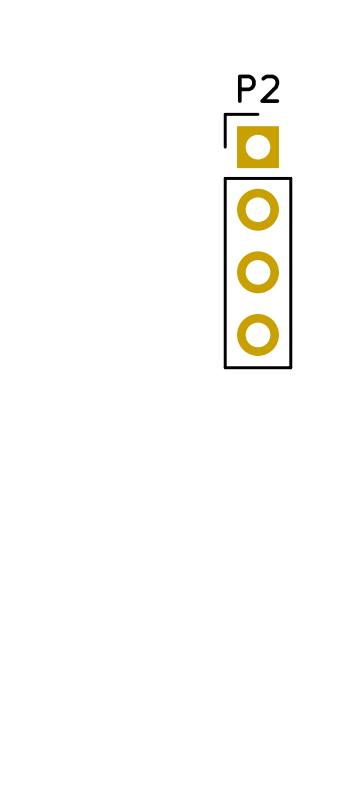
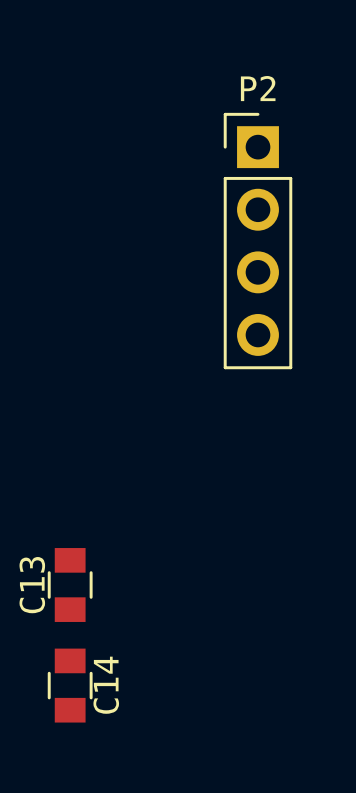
C13: none -> (70, 585)
C14: none -> (70, 685)

